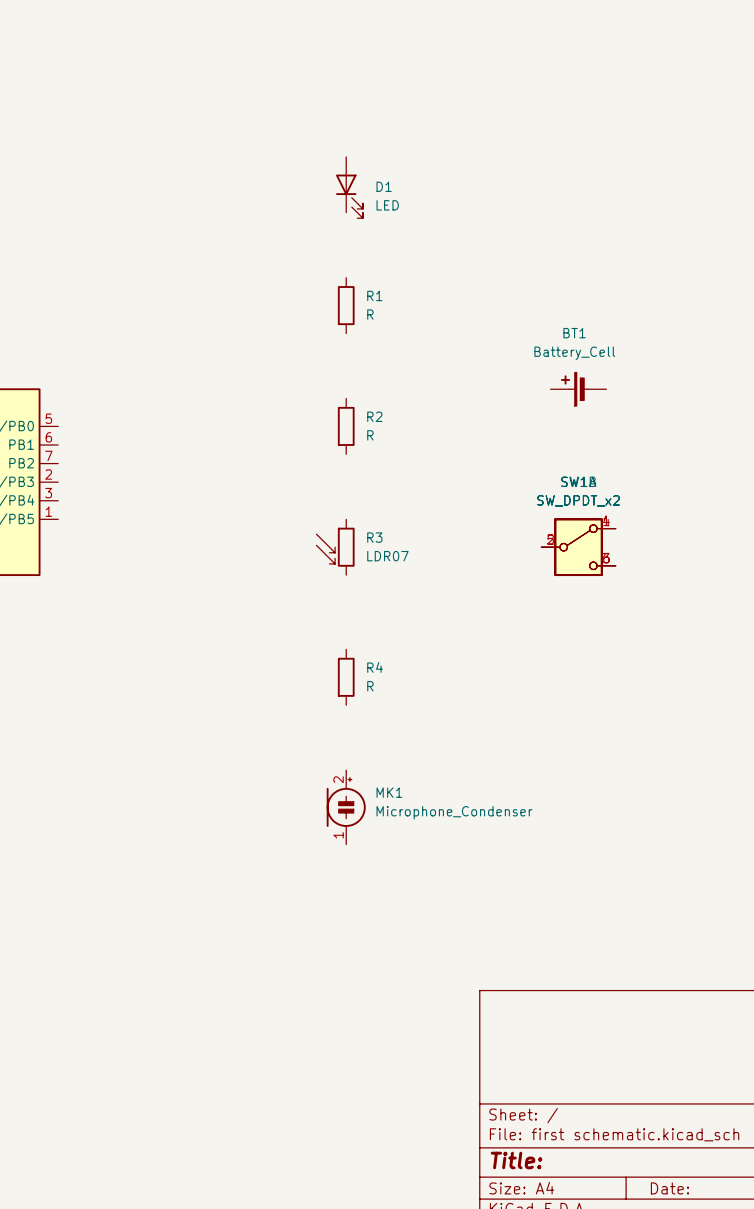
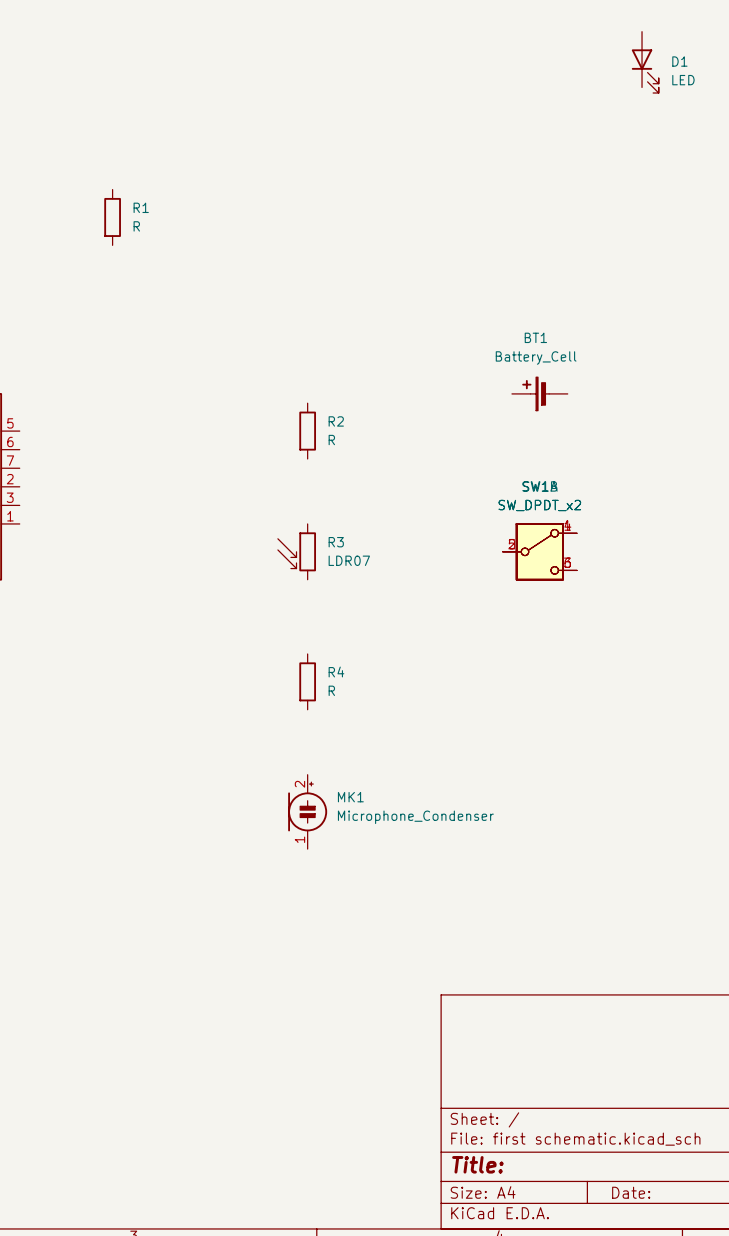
D1 position: (349, 187) -> (645, 62)
R1 position: (346, 305) -> (112, 217)

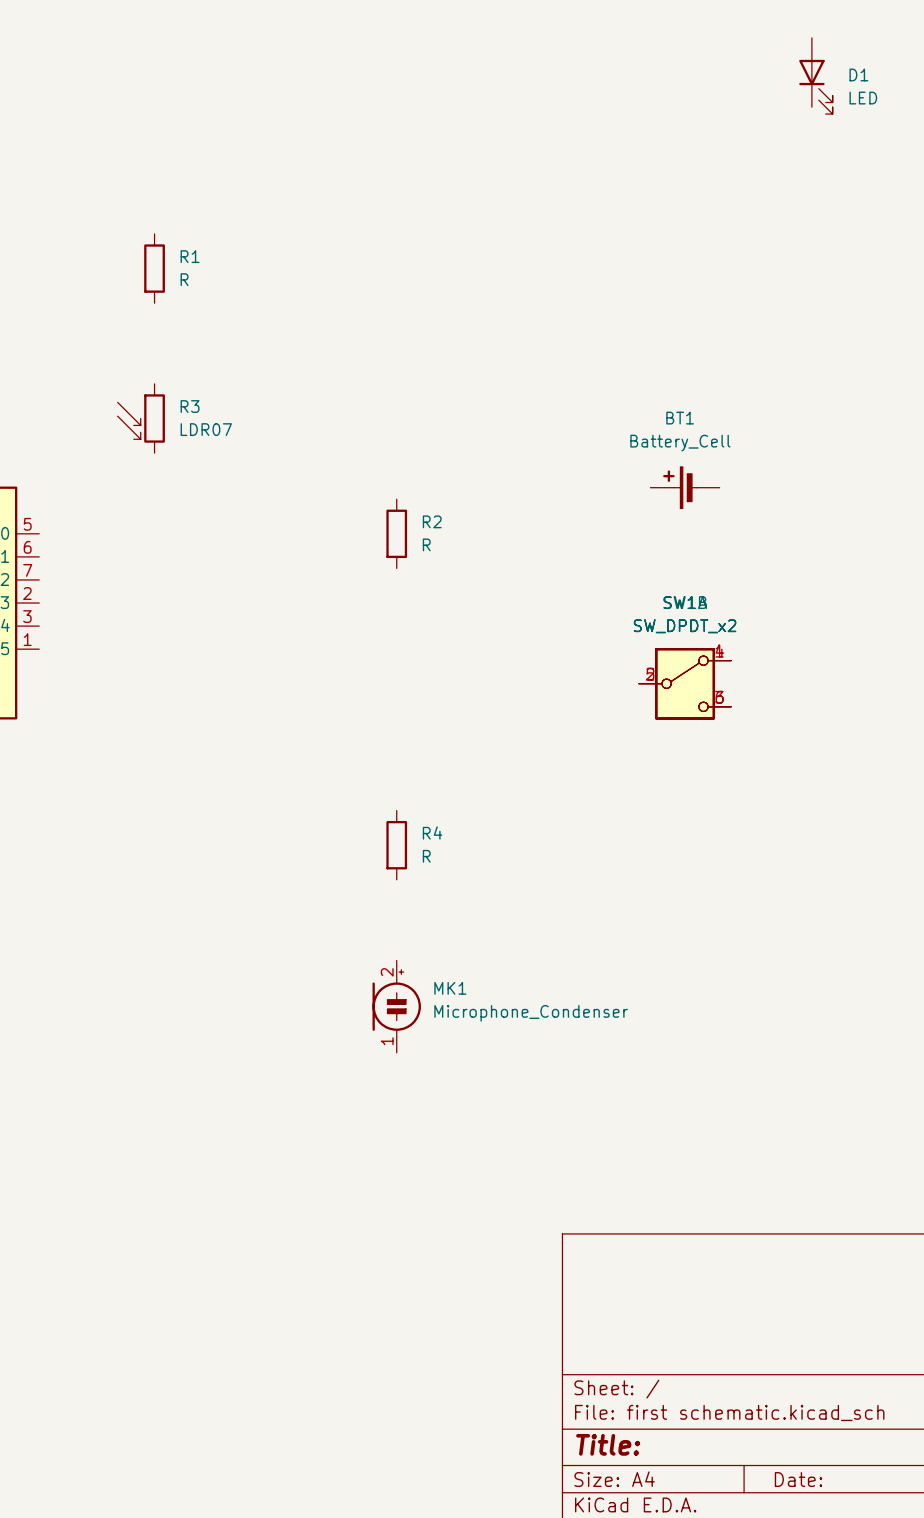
R3 position: (296, 551) -> (141, 418)

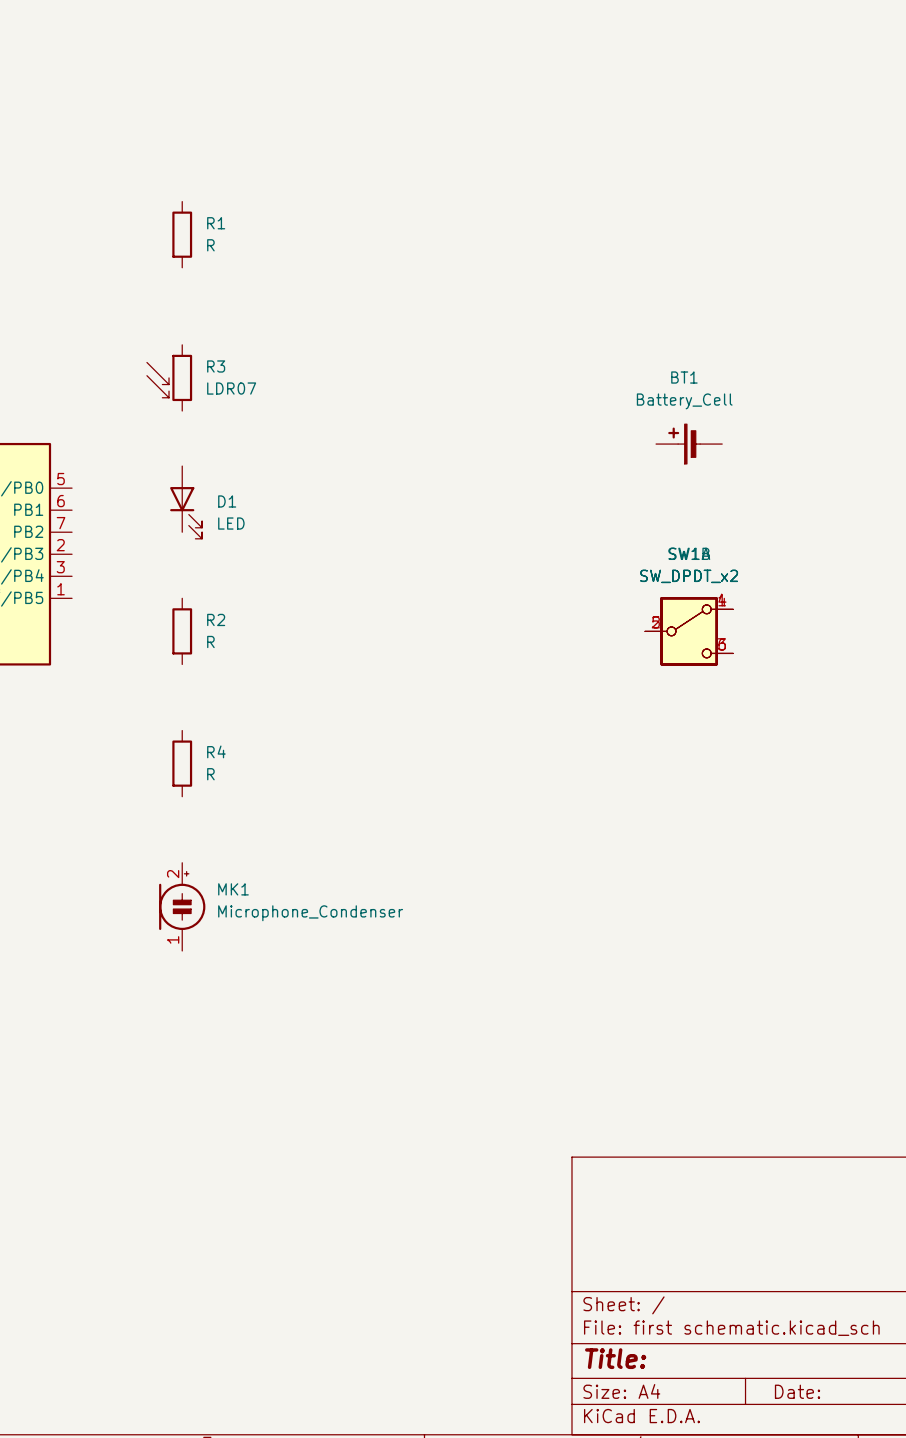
D1 position: (815, 75) -> (186, 502)
R2 position: (396, 533) -> (182, 631)
R4 position: (396, 845) -> (182, 763)
MK1 position: (396, 1006) -> (182, 906)

